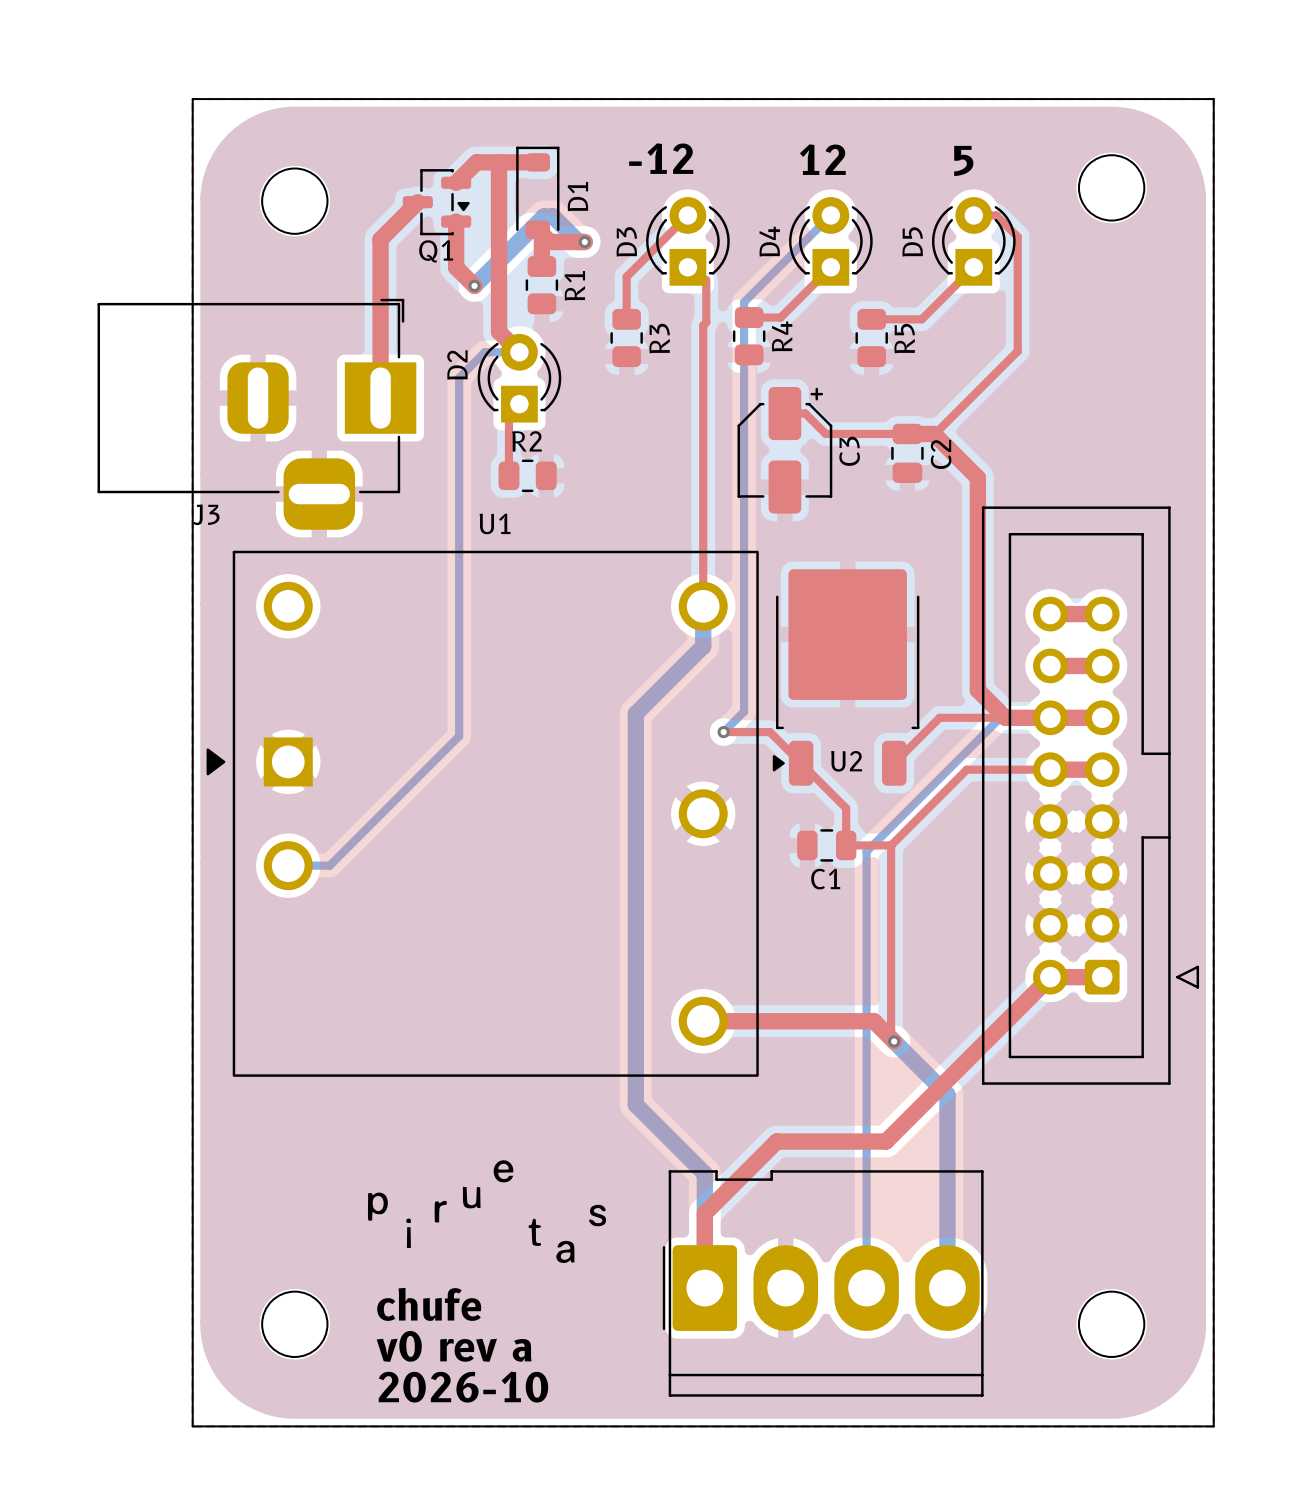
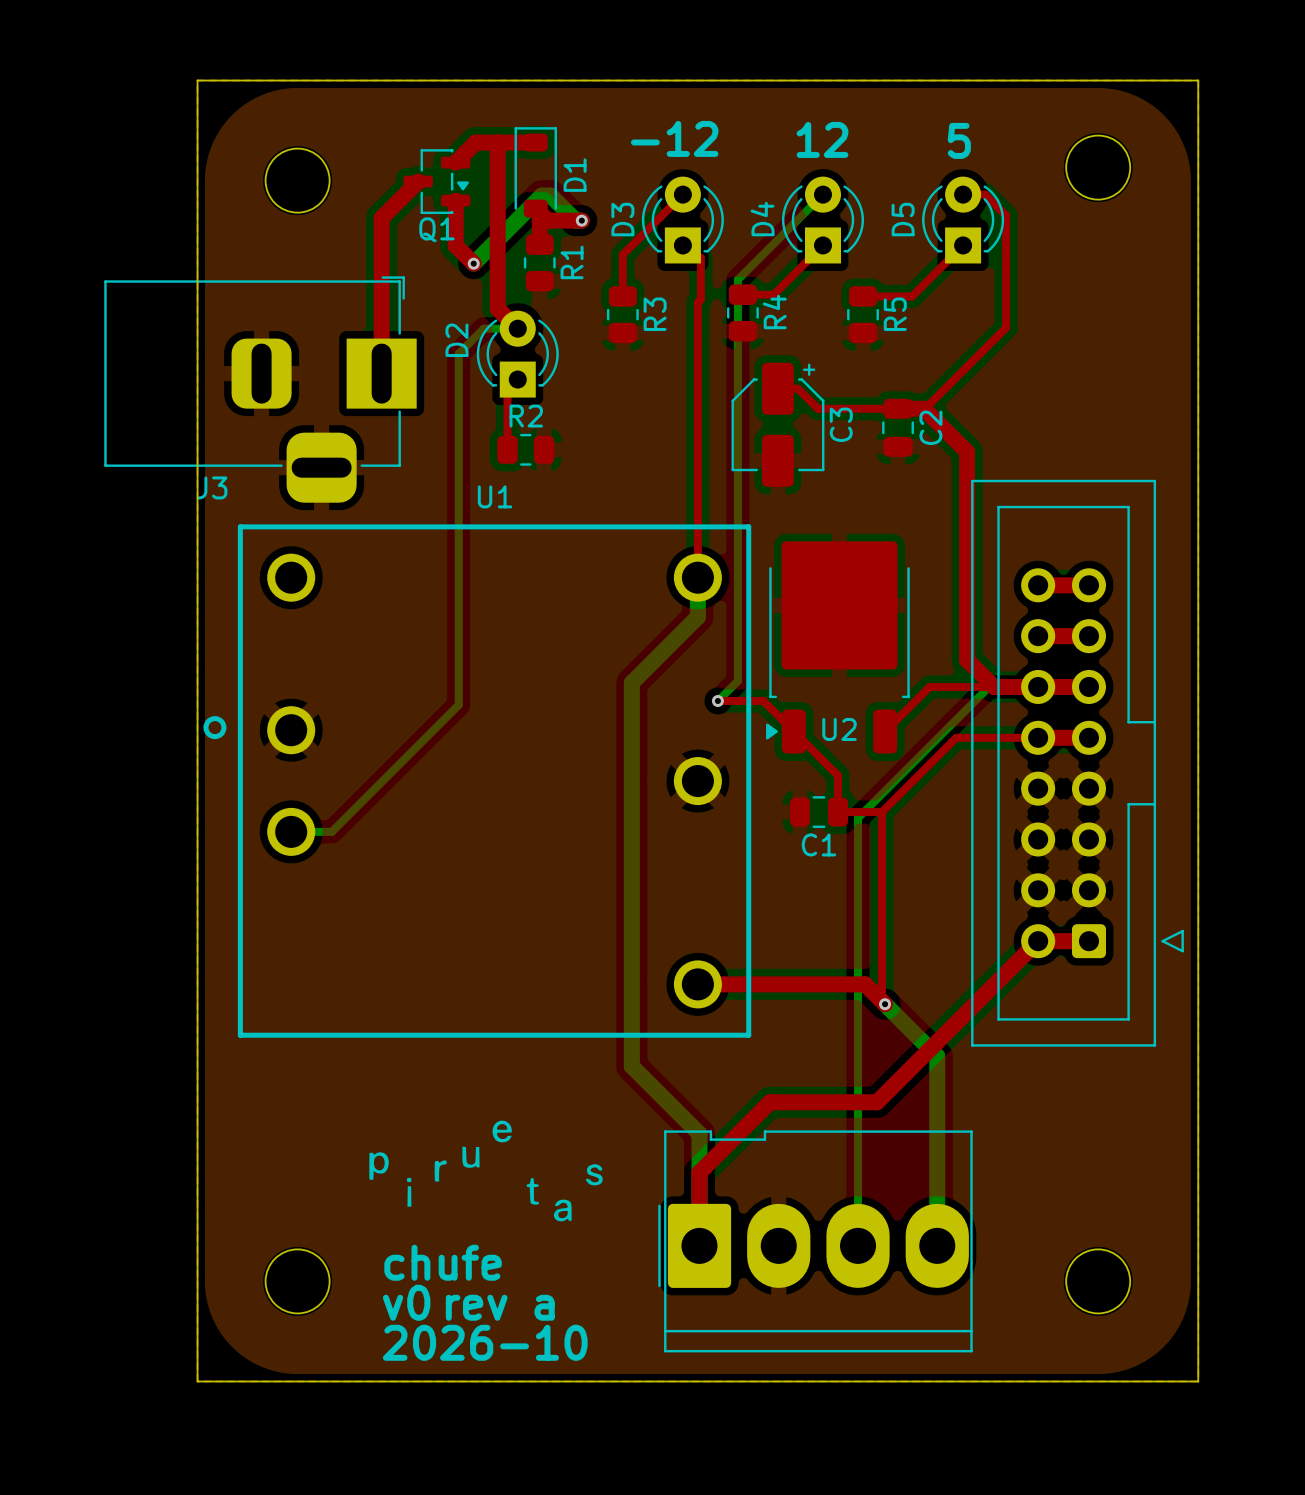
U1 footprint: [206, 550, 759, 1077] -> [203, 524, 752, 1038]

